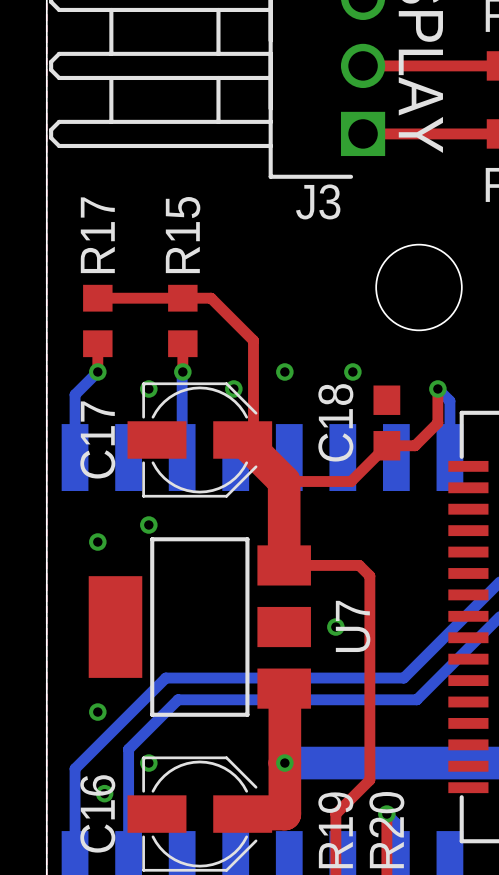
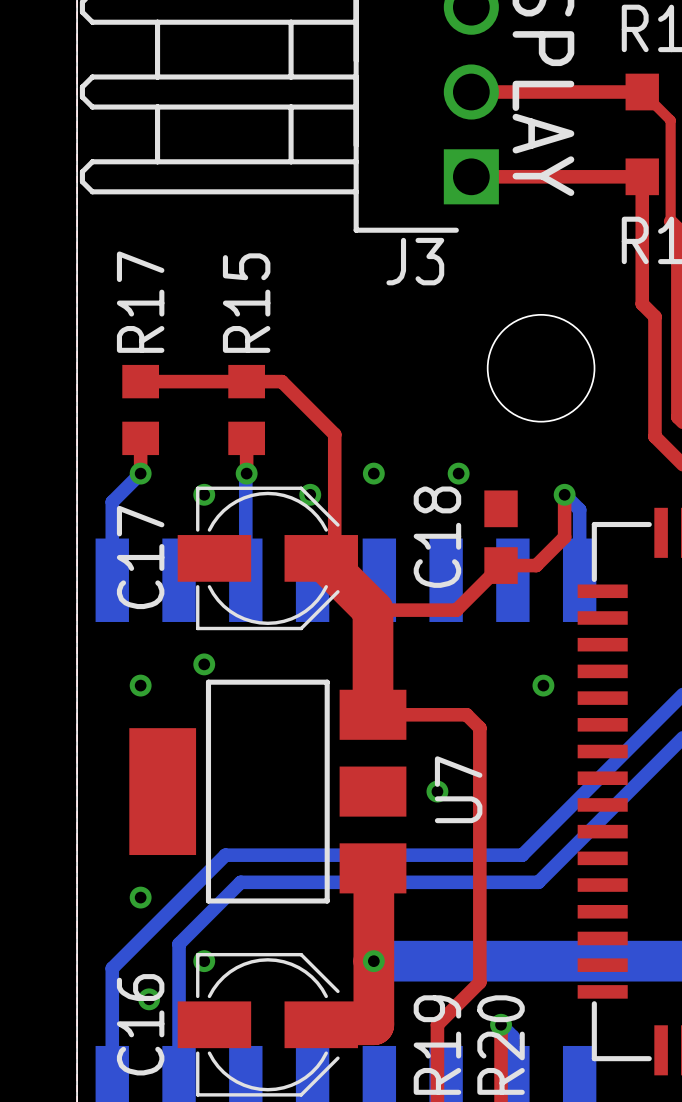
via: none -> (543, 685)

